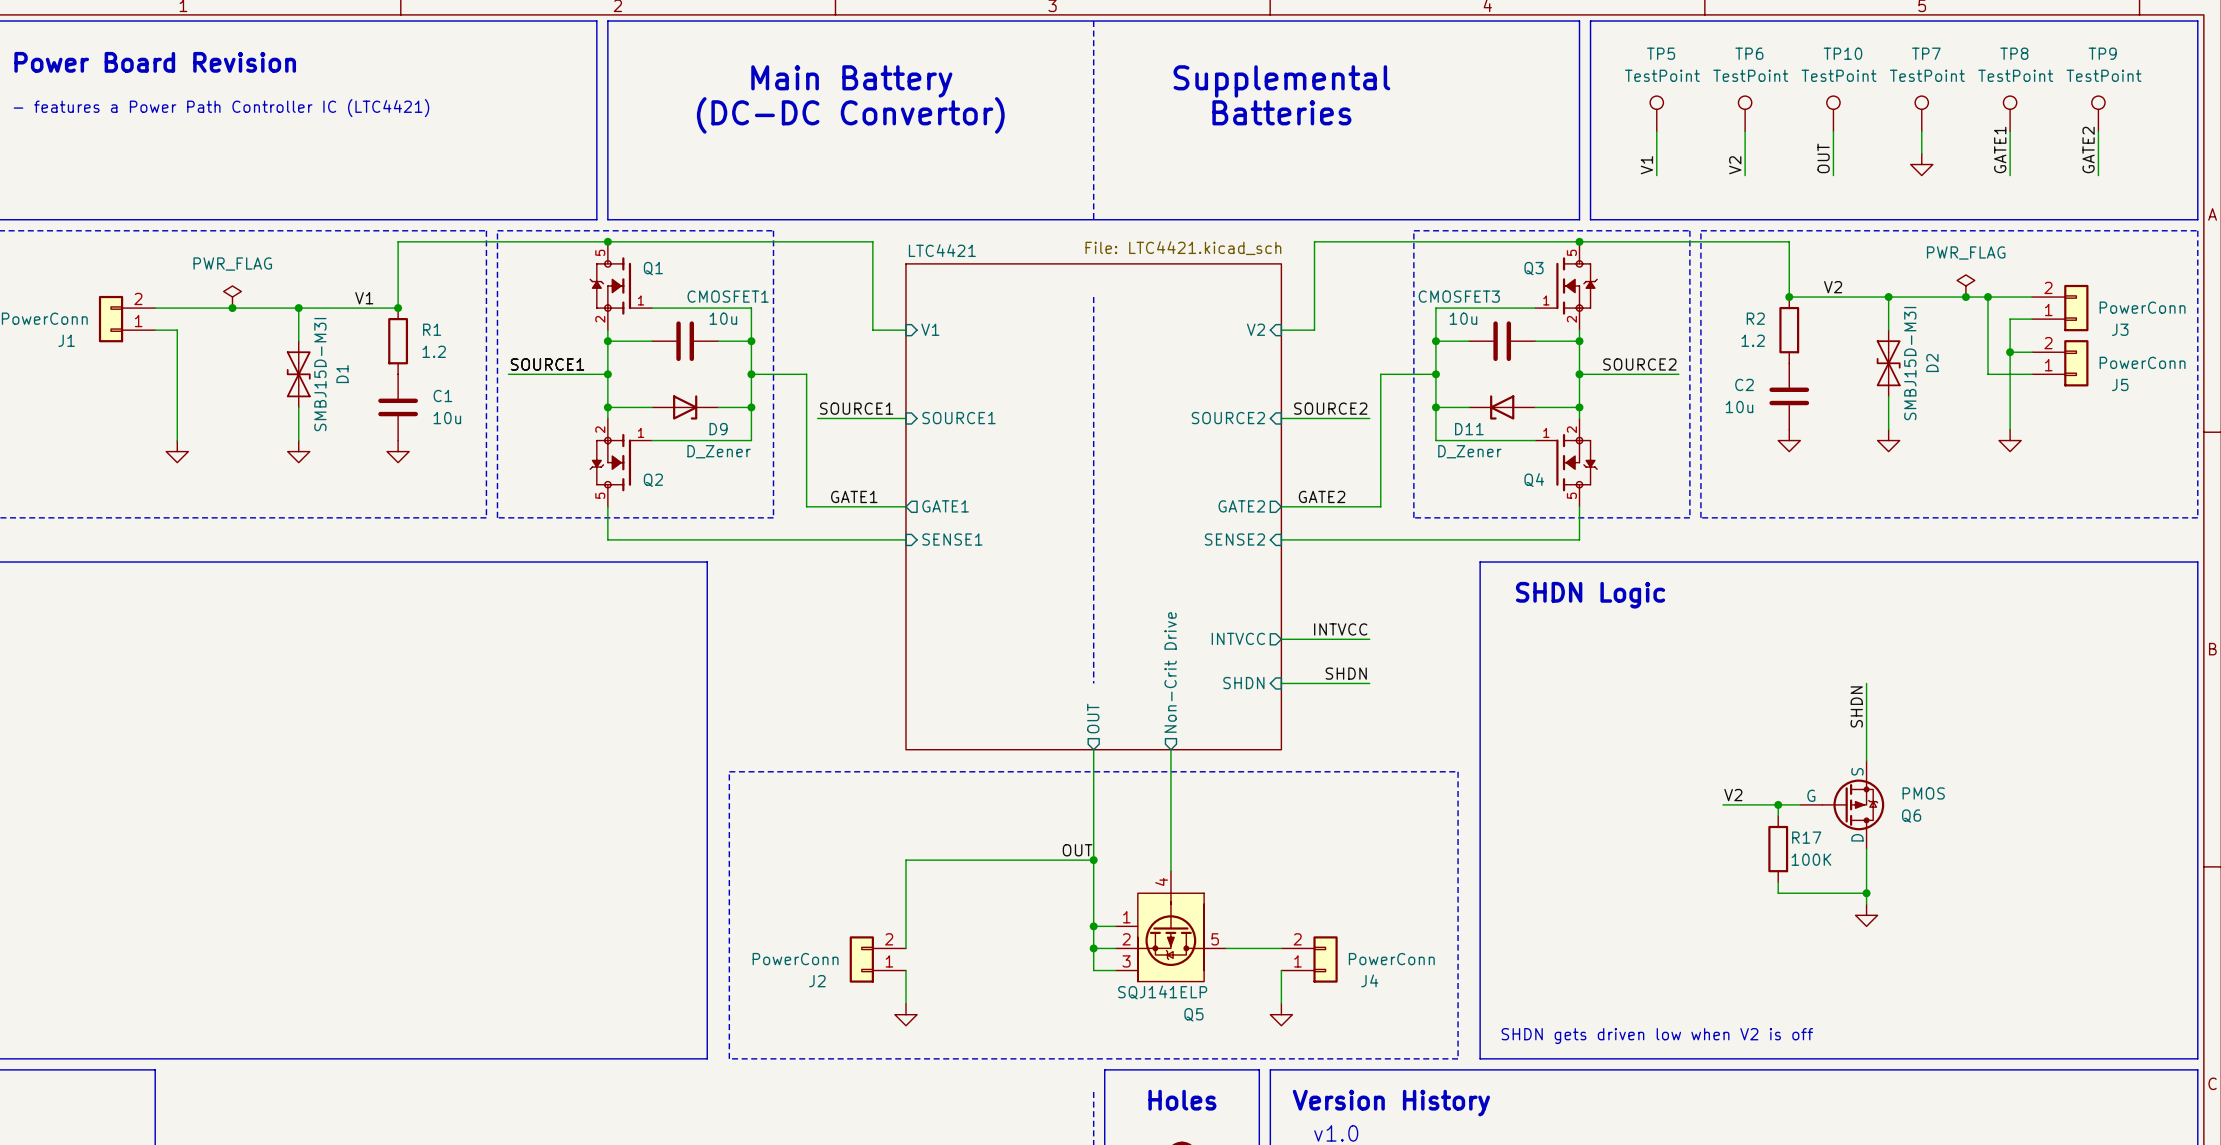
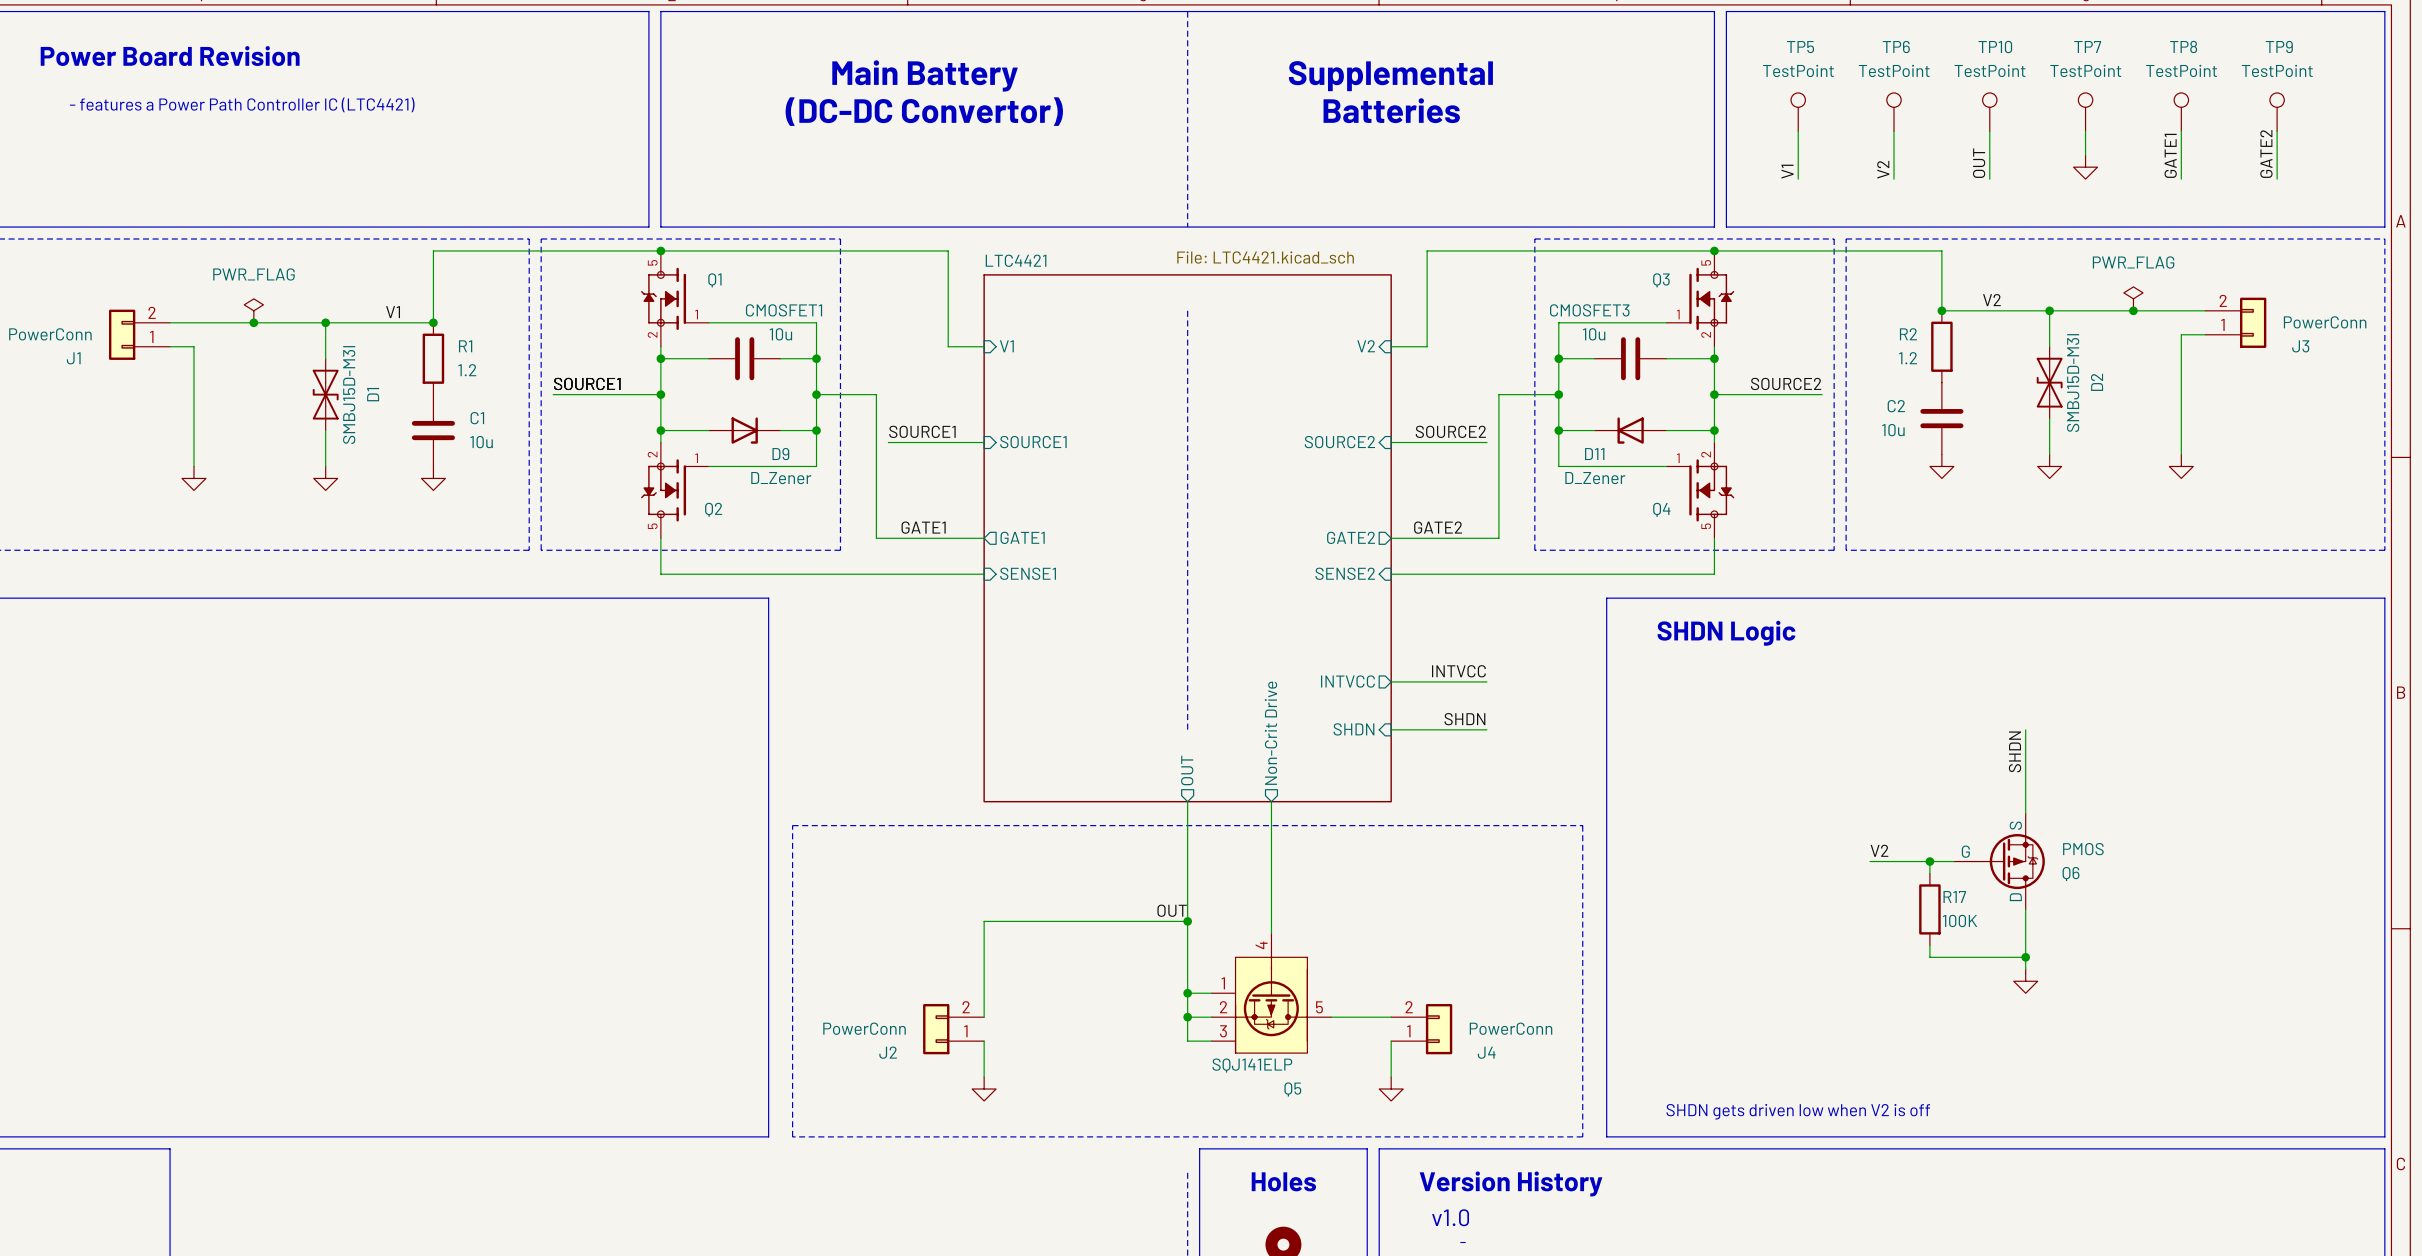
wire: (1988, 297) (1988, 374) (2032, 374) -> none
junction: (1988, 297) -> none
wire: (2010, 352) (2032, 352) -> none
junction: (2010, 352) -> none
J5: PowerConn (2060, 363) -> none

